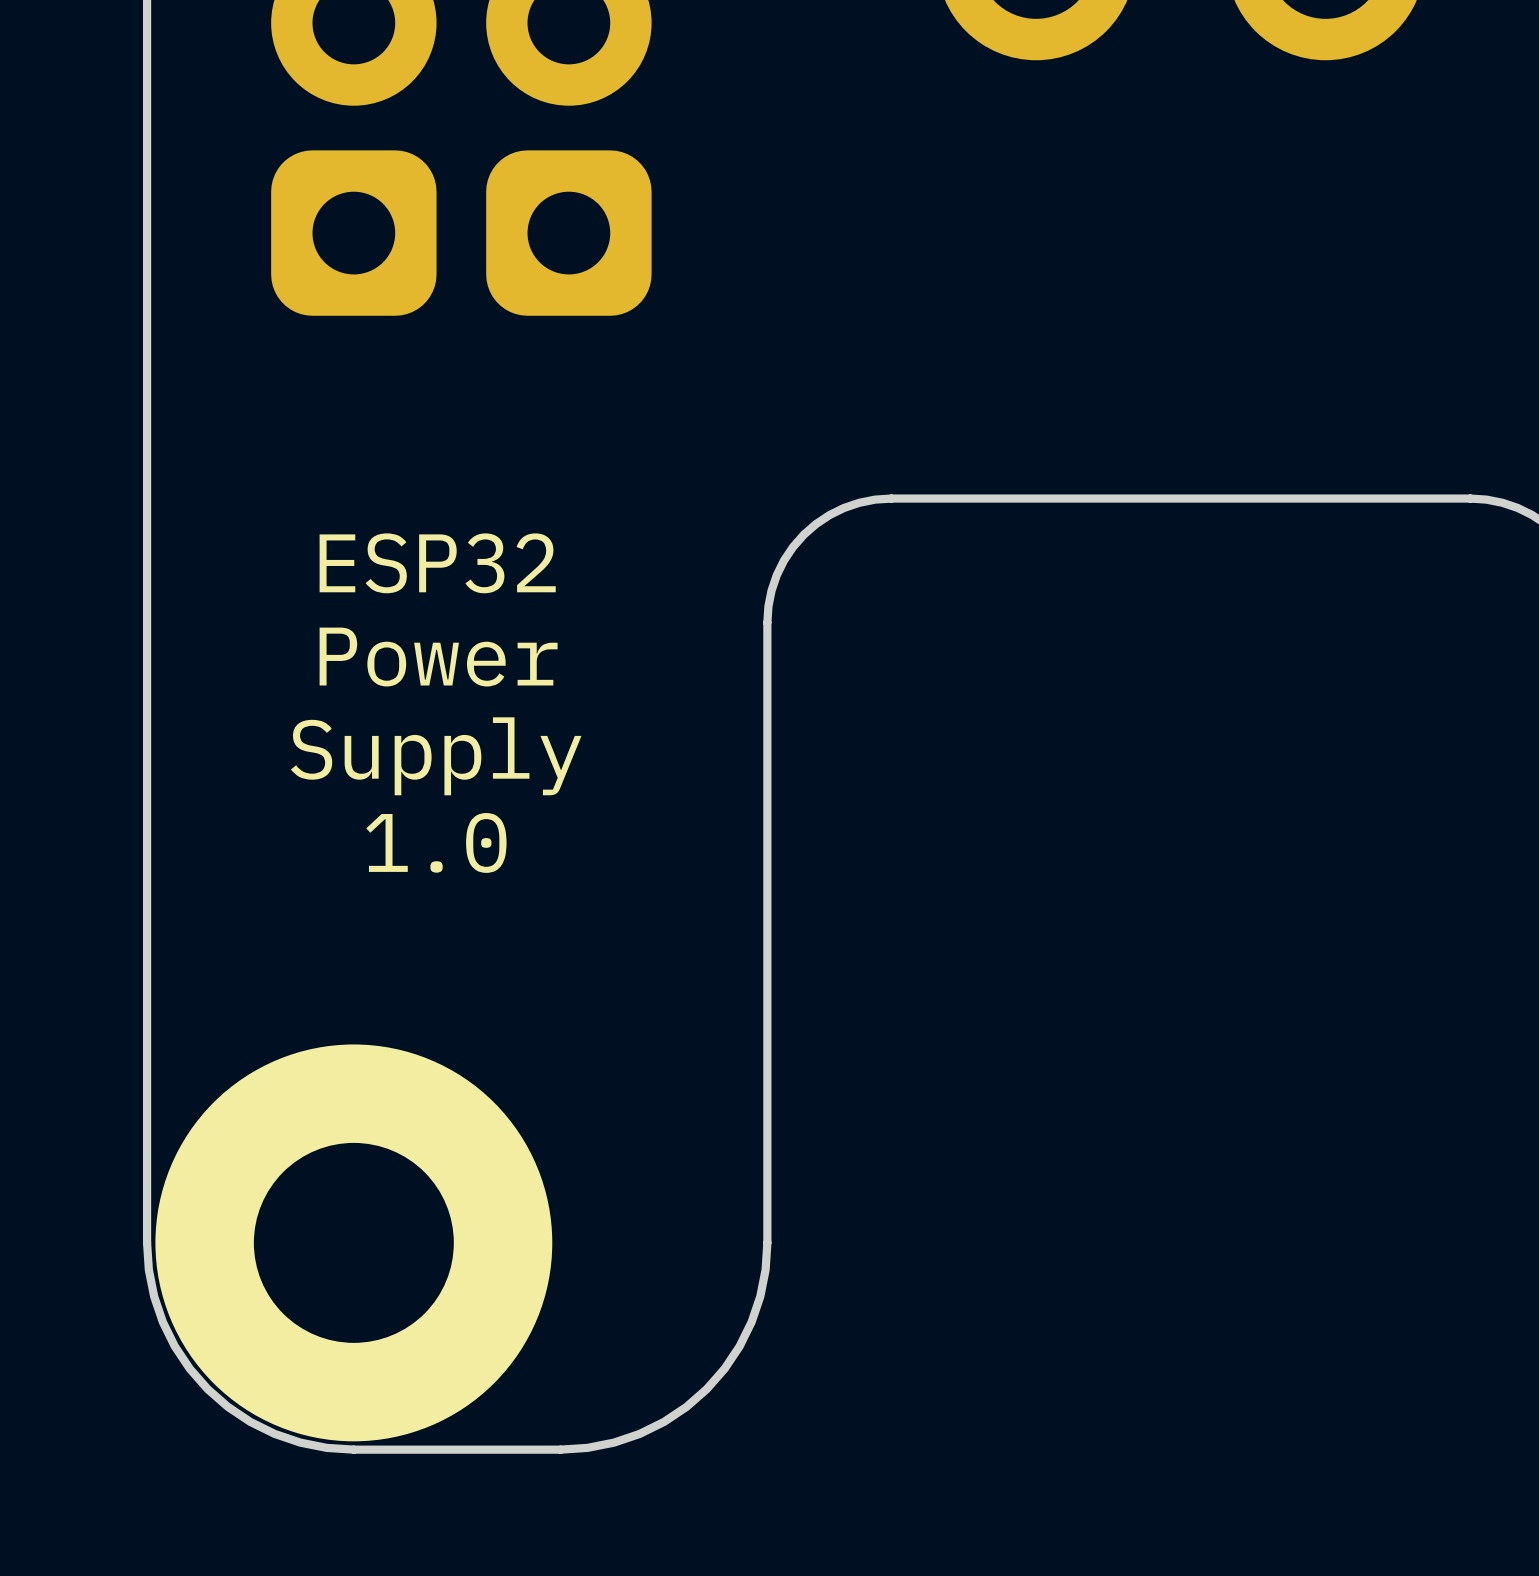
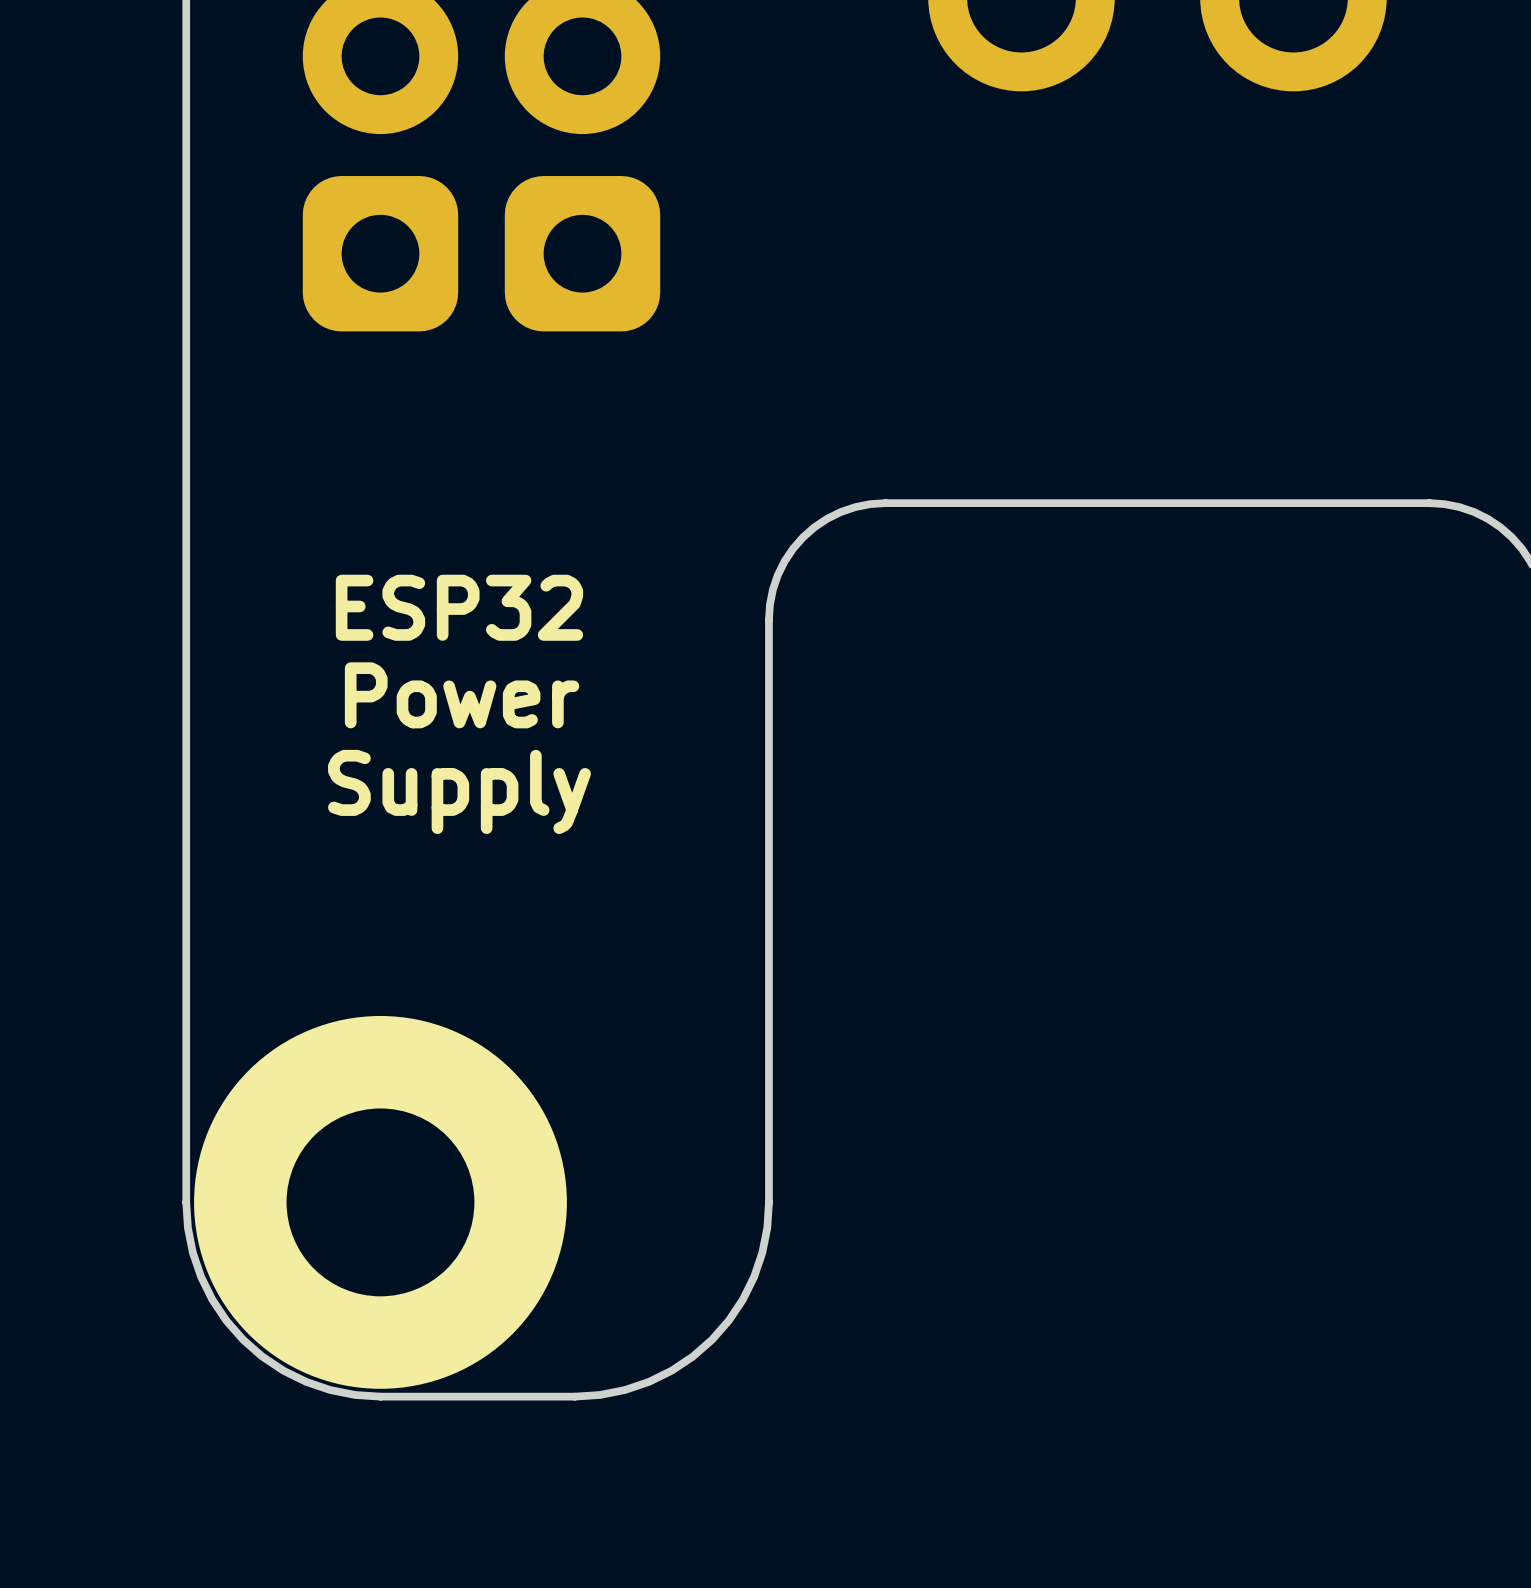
text position: ESP32 (437, 563) -> ESP32 (459, 607)
text position: Power (438, 657) -> Power (462, 695)
text position: Supply (436, 756) -> Supply (459, 791)
text: 1.0 (436, 842) -> none

